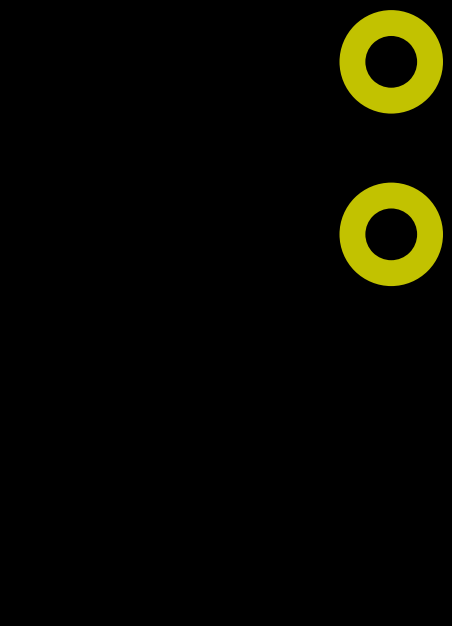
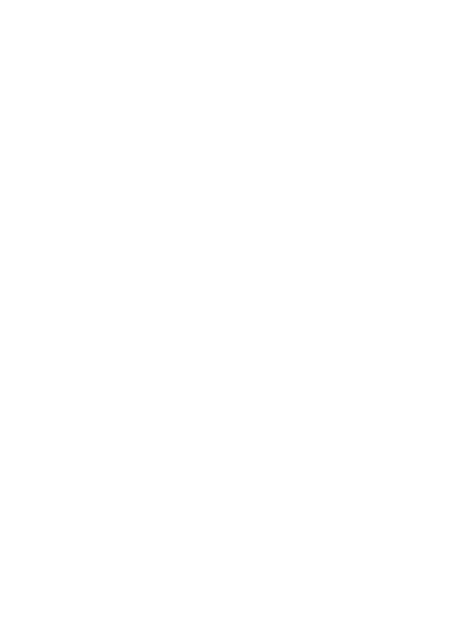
part: (391, 148) -> none

